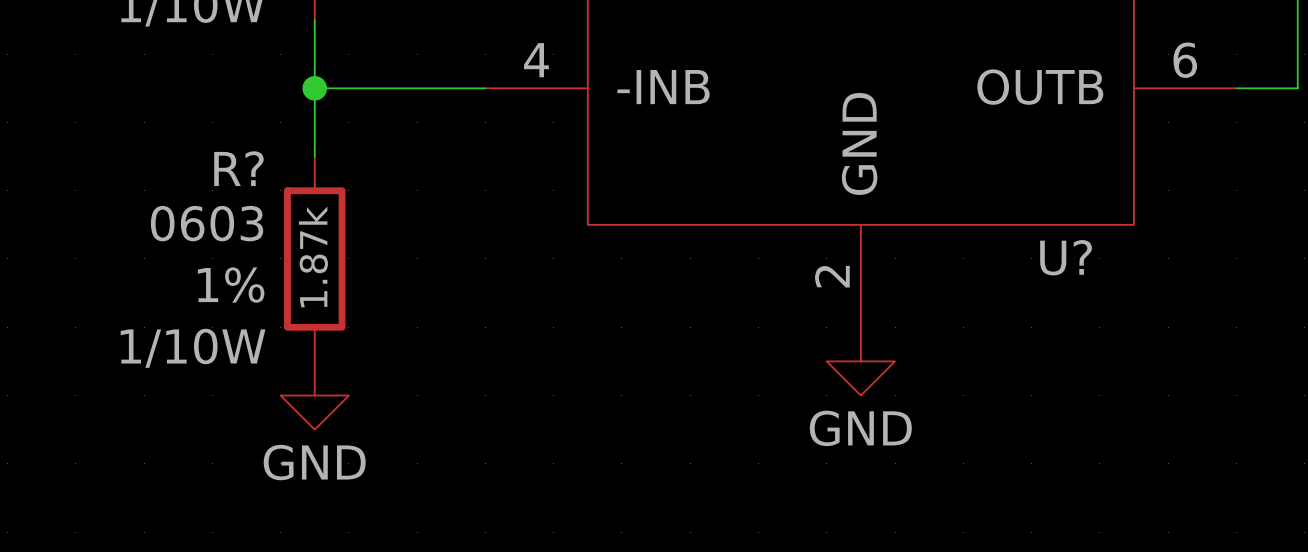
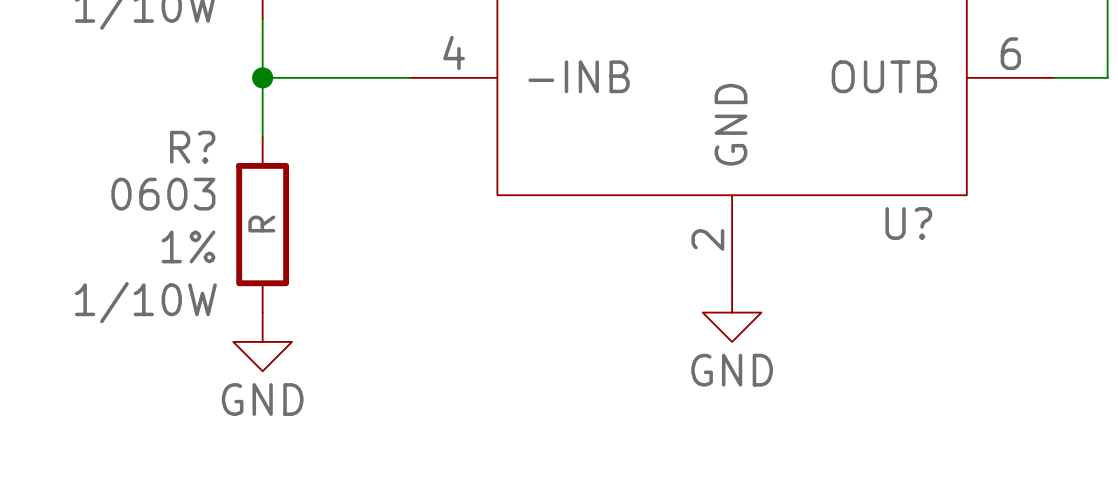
R? value: 1.87k (313, 256) -> R (261, 224)

